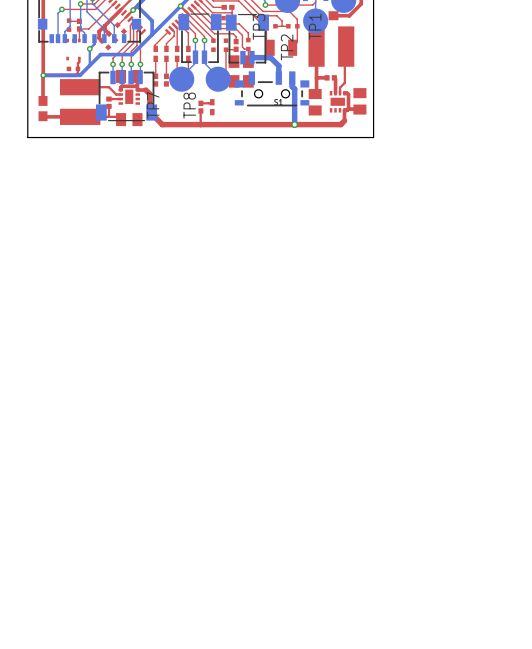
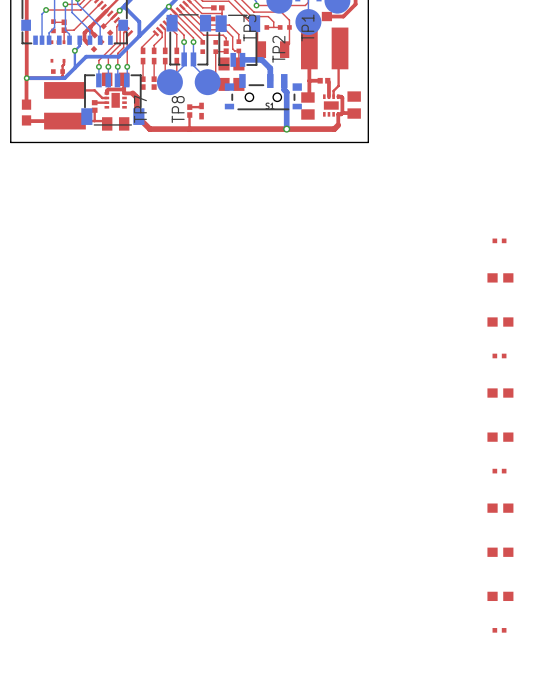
part: none -> (499, 240)
part: none -> (500, 277)
part: none -> (500, 322)
part: none -> (499, 355)
part: none -> (500, 393)
part: none -> (500, 437)
part: none -> (499, 471)
part: none -> (500, 508)
part: none -> (500, 552)
part: none -> (500, 596)
part: none -> (499, 630)

